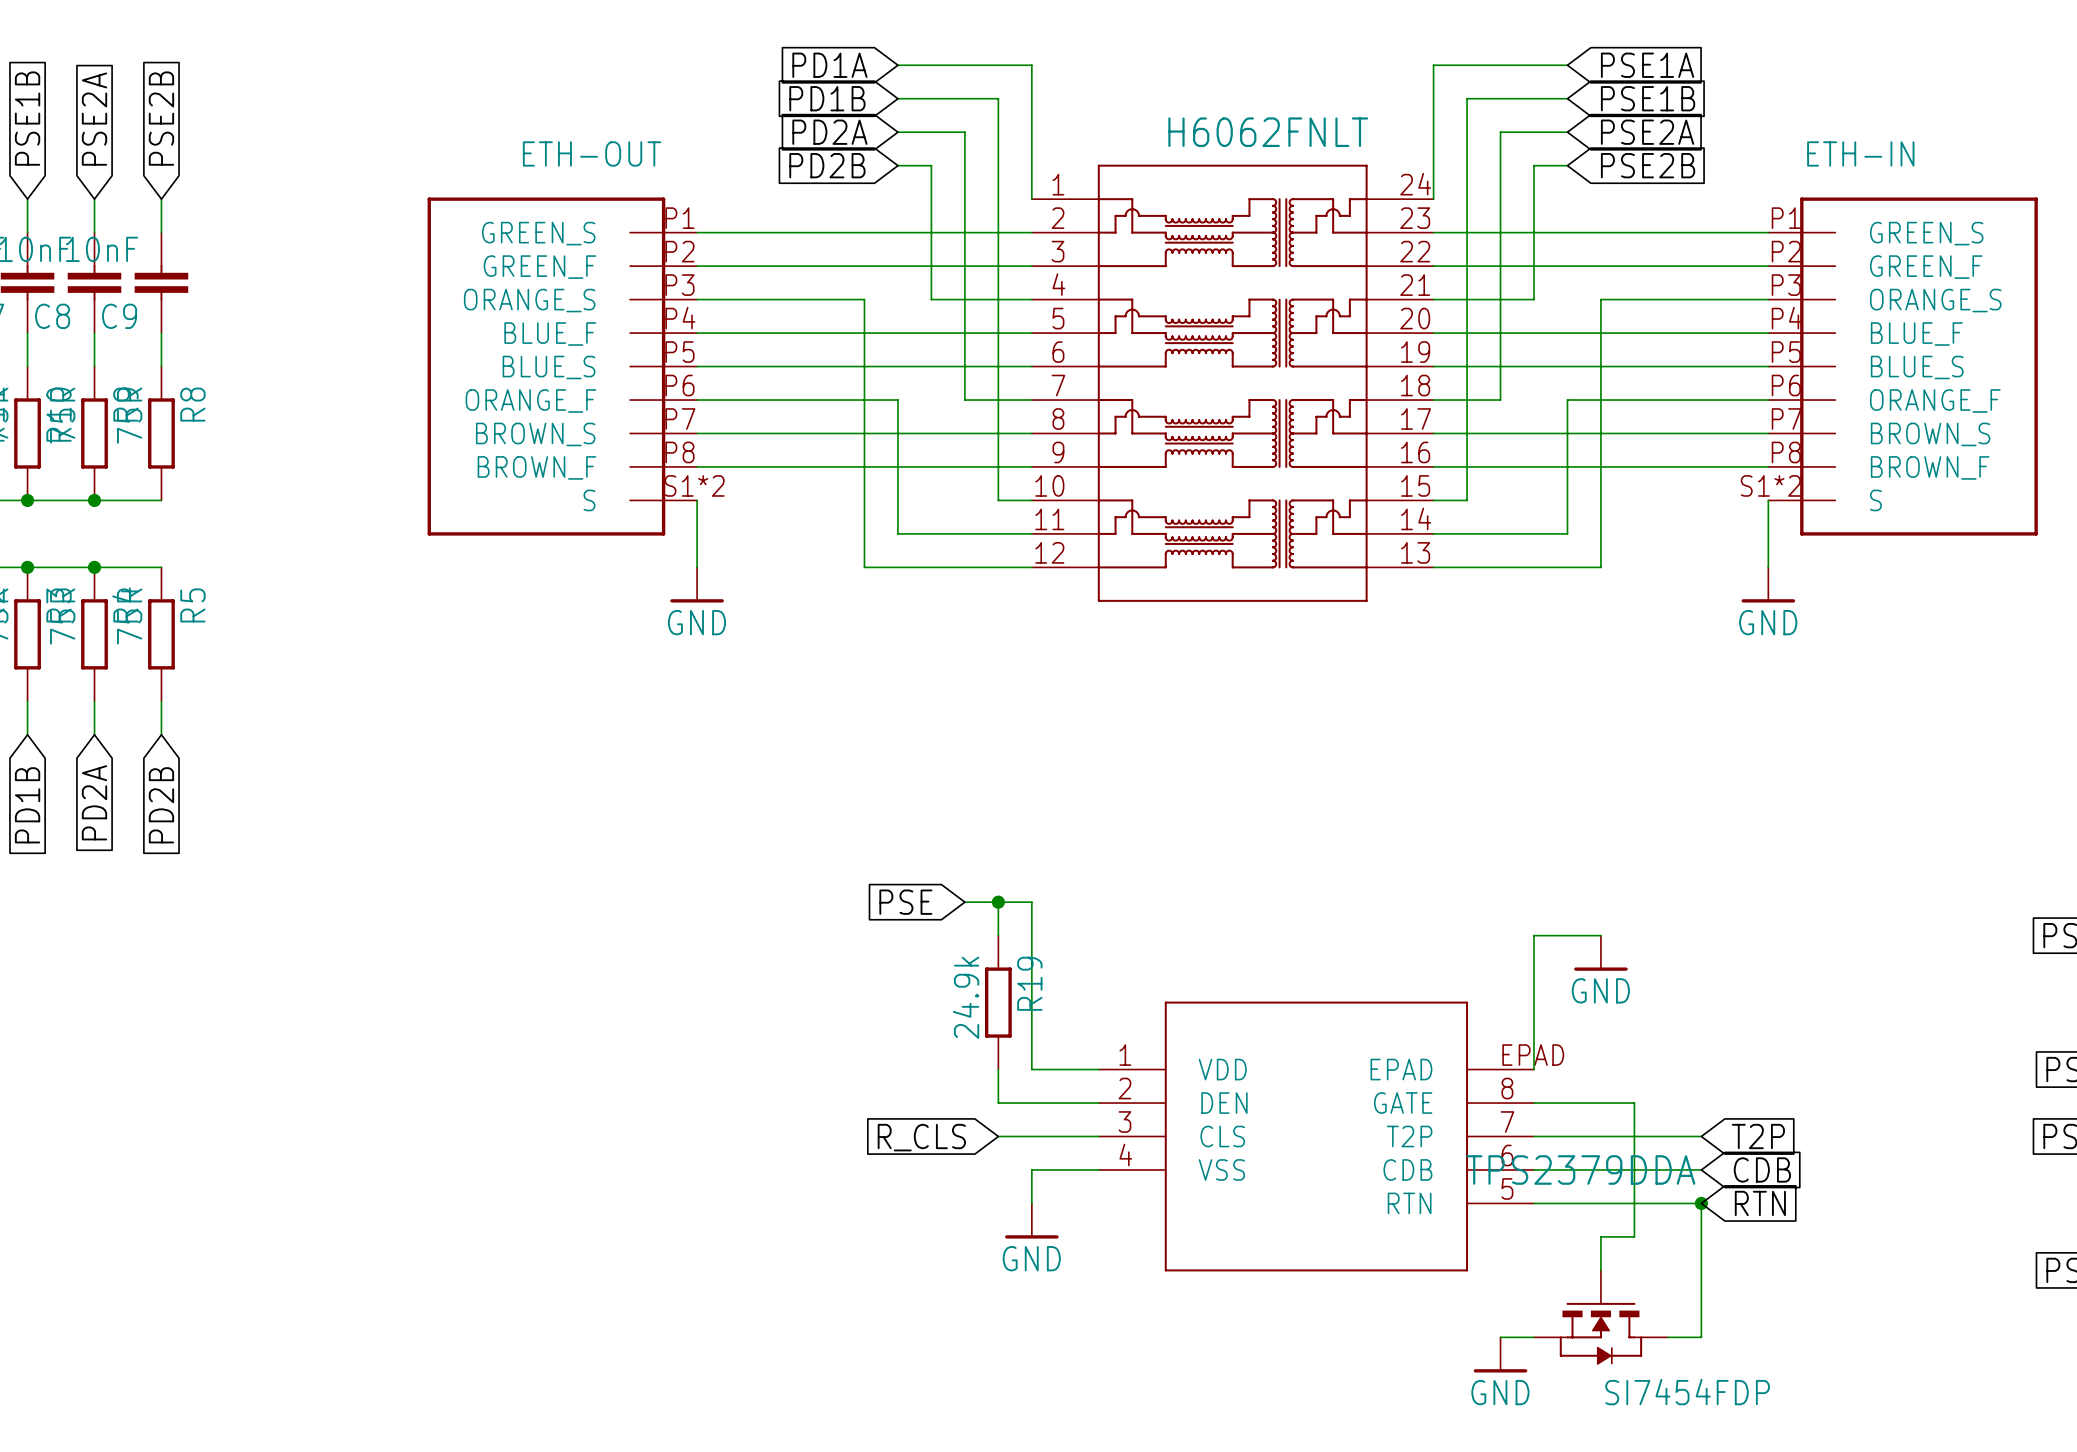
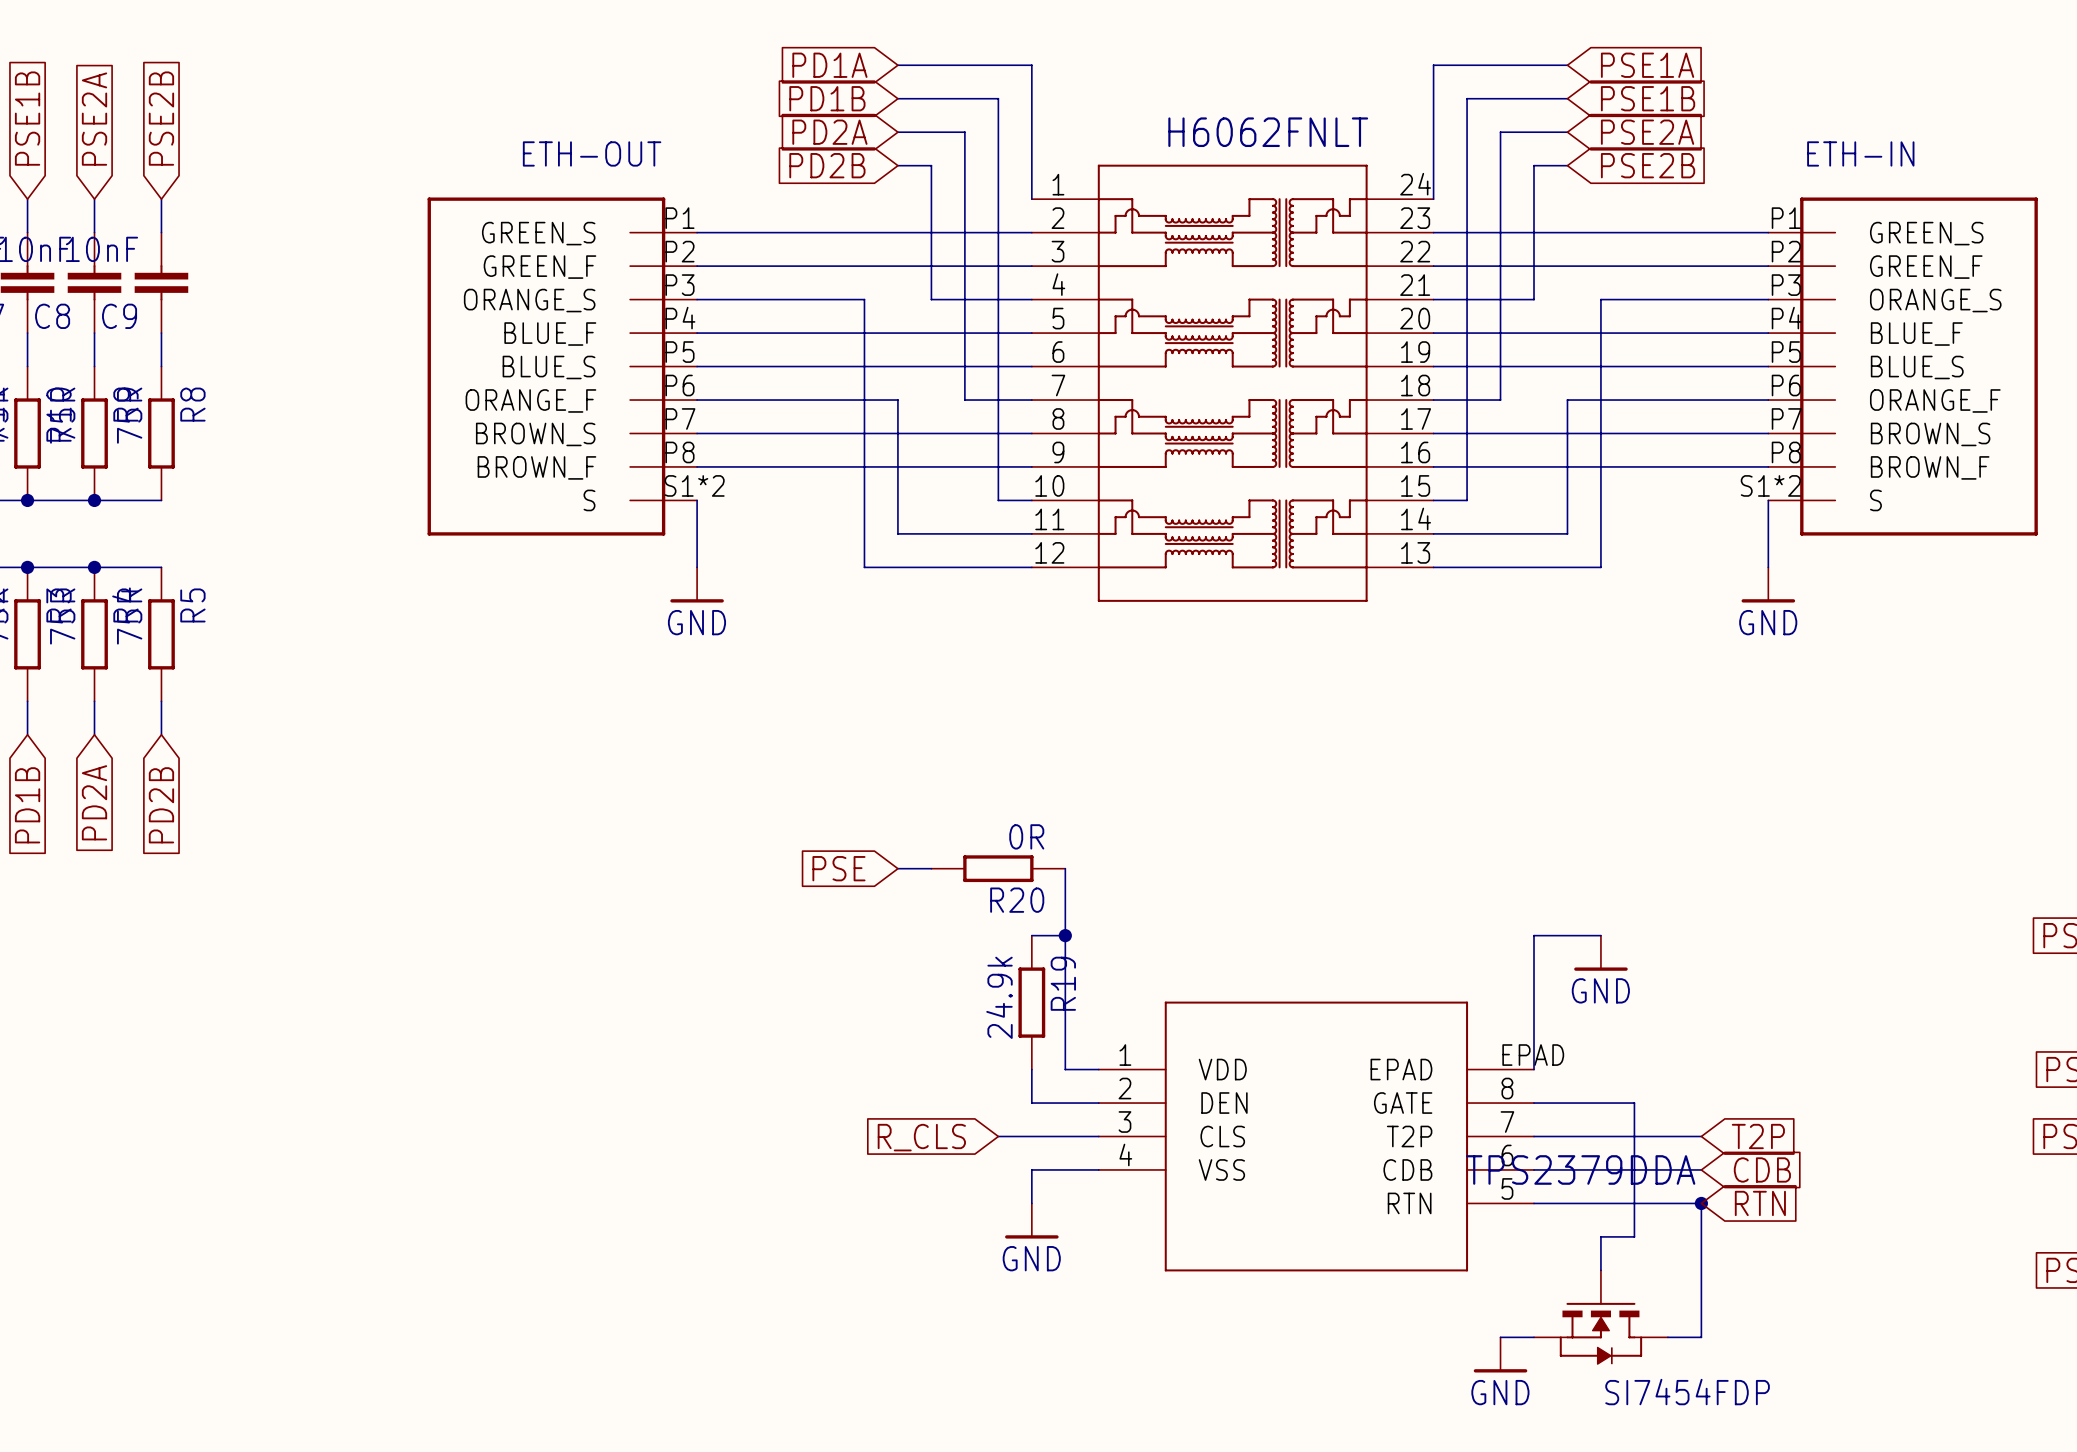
wire: none -> (897, 868) (931, 868)
R20: none -> 0R (998, 868)
global label position: PSE (905, 902) -> PSE (838, 868)
wire: (964, 902) (1031, 902) (1031, 1069) (1065, 1069) -> (1065, 868) (1065, 1069)
wire: (998, 902) (998, 935) -> none
junction position: (998, 902) -> (1065, 935)
wire: none -> (1031, 935) (1065, 935)
R19 position: (998, 1002) -> (1031, 1002)
wire: (998, 1069) (998, 1103) (1031, 1103) -> (1031, 1069) (1031, 1103)

